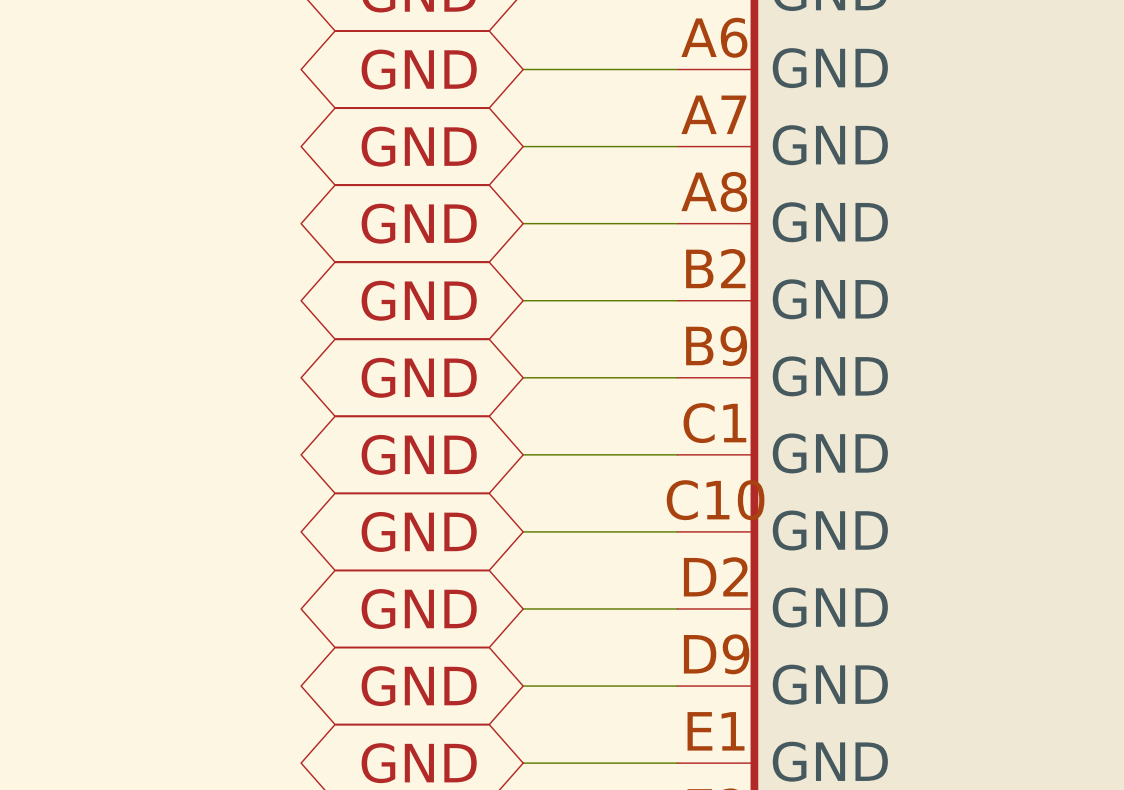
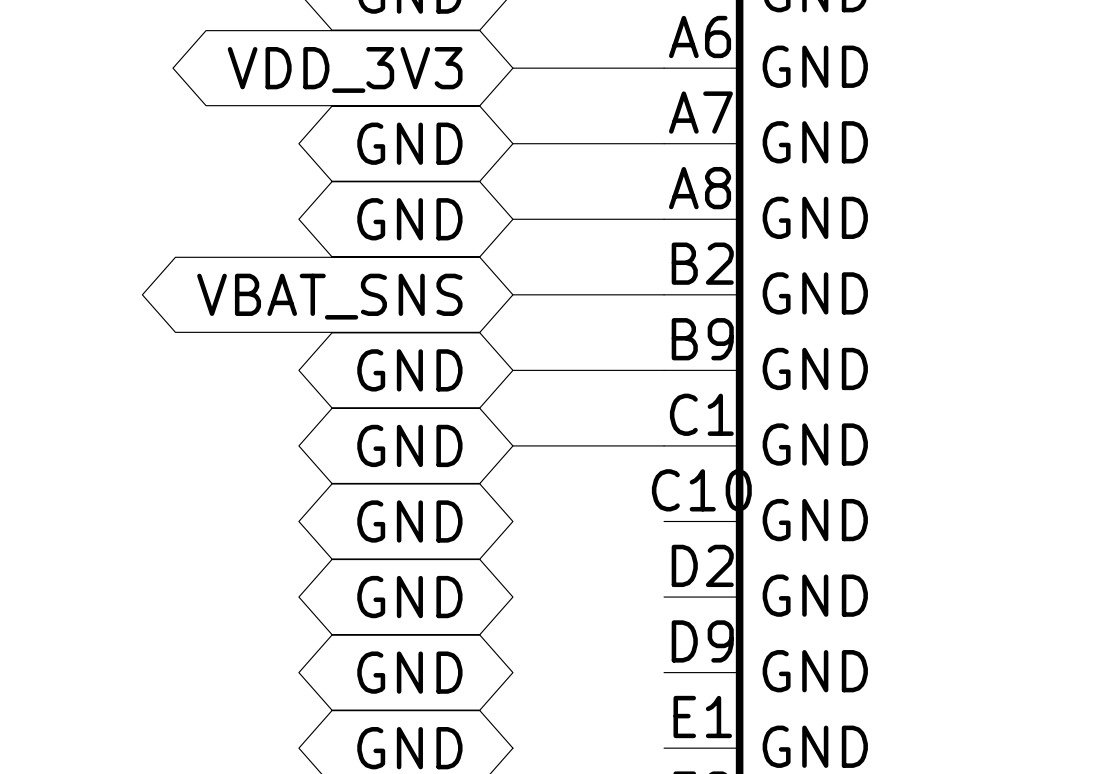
global label: GND (419, 69) -> VDD_3V3 (345, 69)
global label: GND (419, 300) -> VBAT_SNS (329, 296)
wire: (523, 531) (677, 531) -> none
wire: (523, 608) (677, 608) -> none
wire: (523, 686) (677, 686) -> none
wire: (523, 763) (677, 763) -> none

